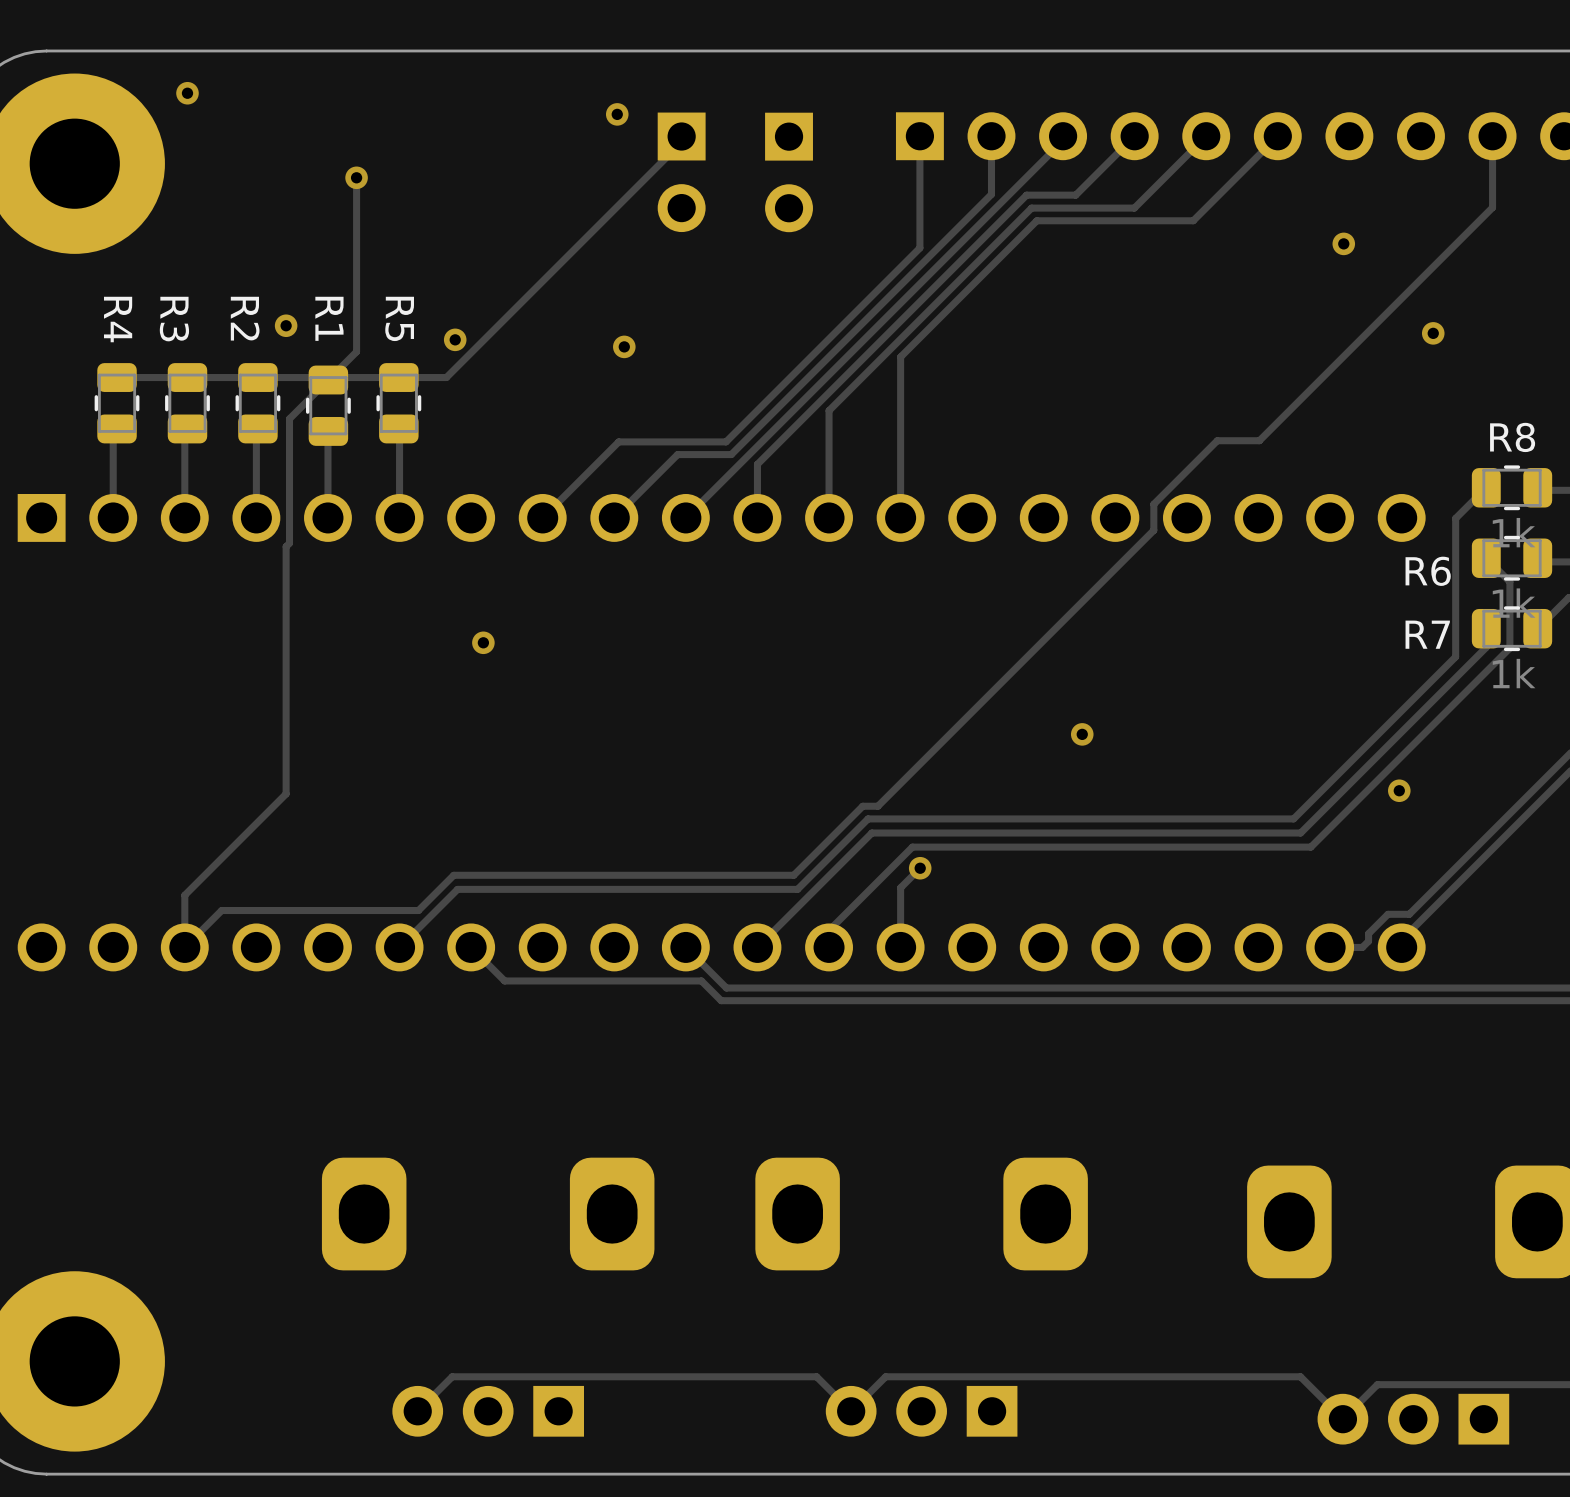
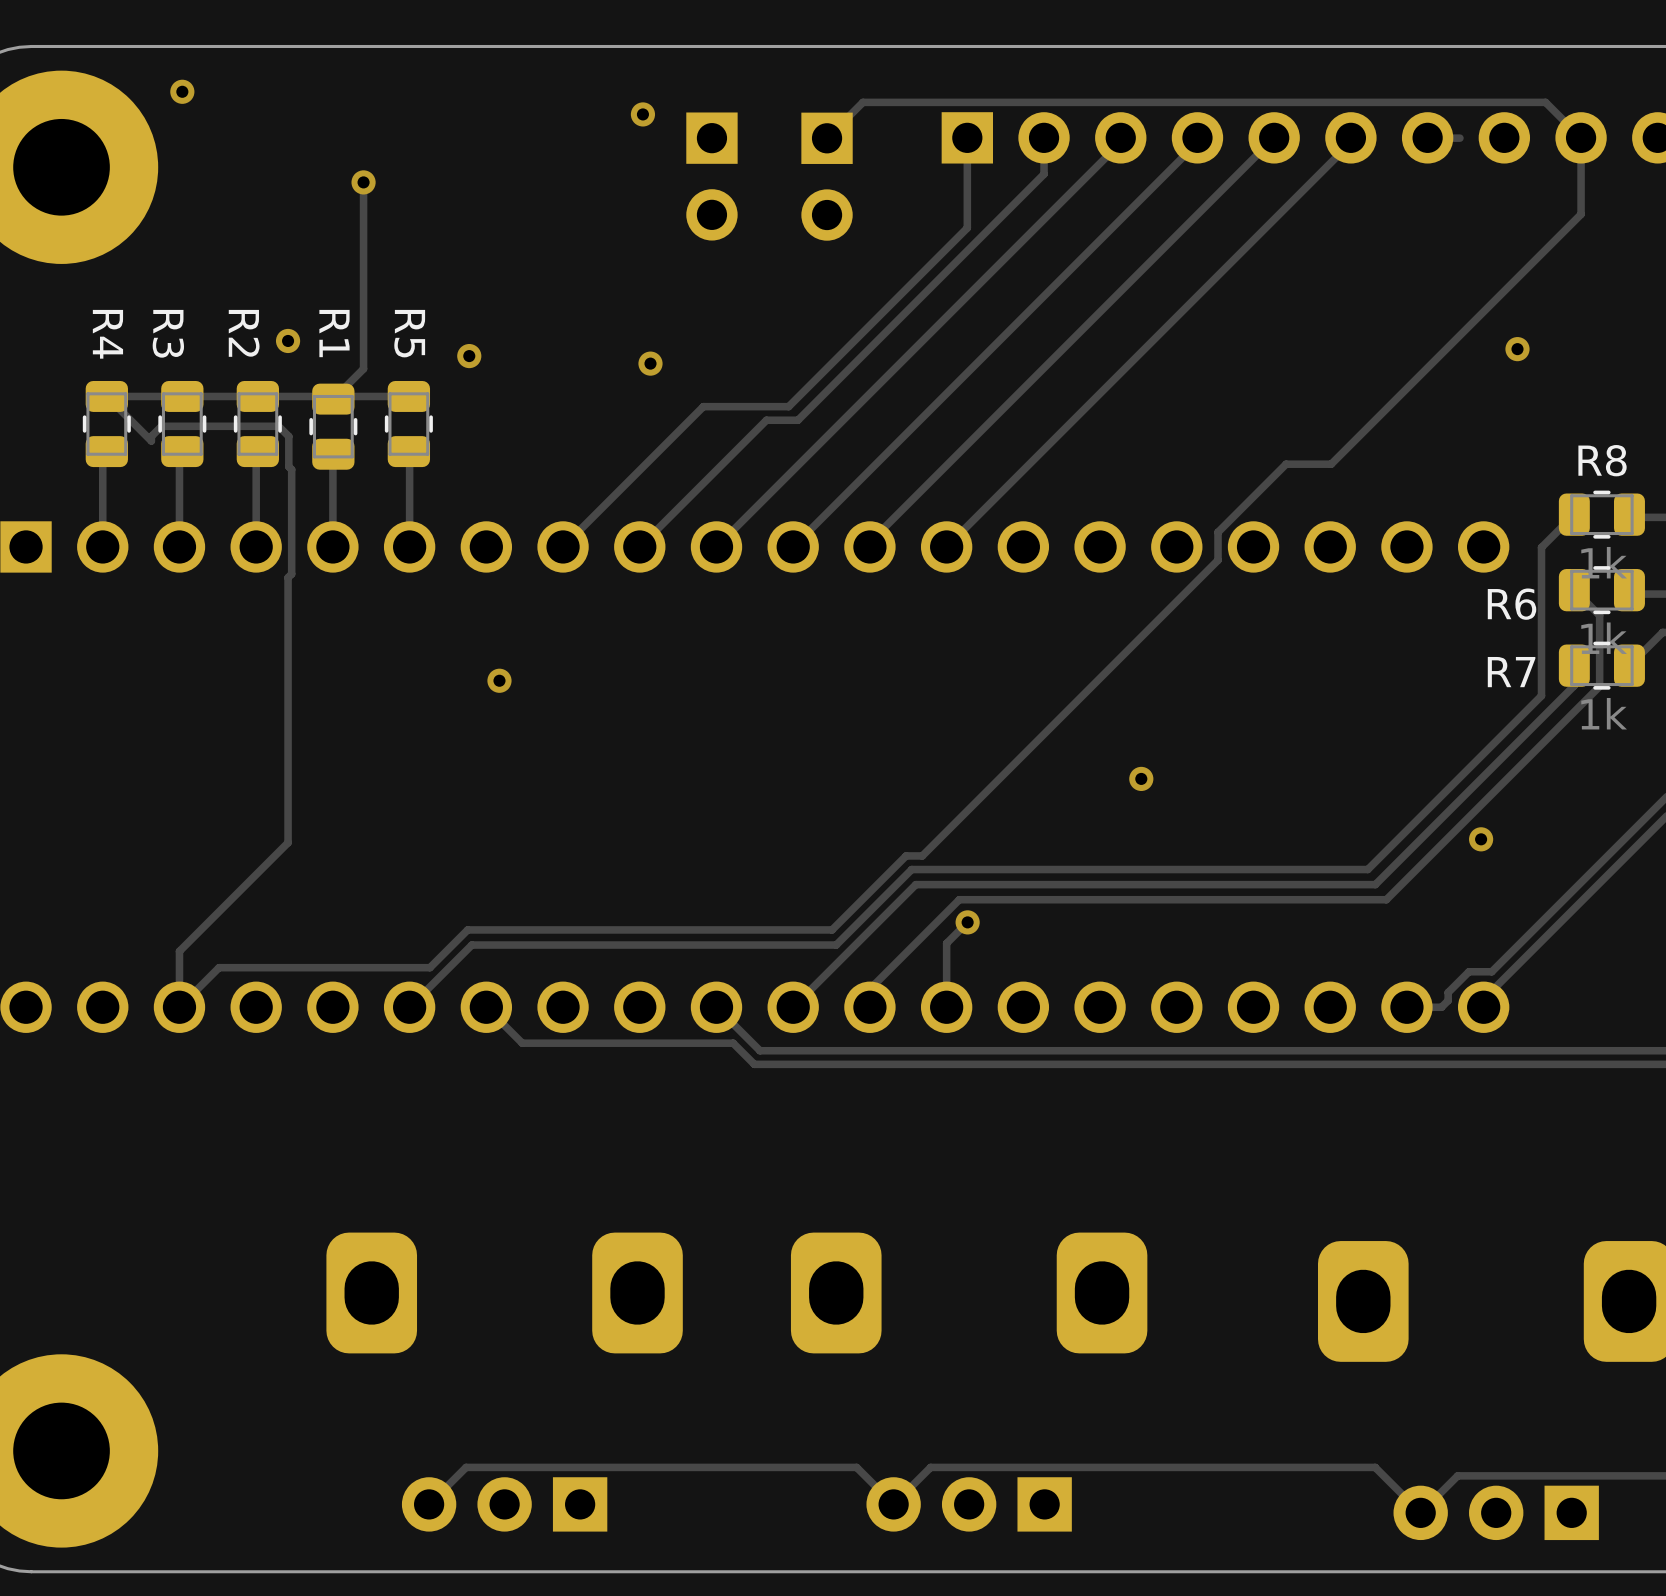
track: (681, 136) (681, 142) (446, 377) (398, 377) -> none
track: (1134, 136) (1075, 195) (1026, 195) (757, 464) (757, 509) -> none
track: (1277, 136) (1193, 220) (1036, 220) (900, 357) (900, 507) -> none
track: none -> (1459, 138) (1449, 138)
track: none -> (1581, 137) (1545, 102) (862, 102) (827, 138)
track: none -> (1197, 142) (793, 546)
track: none -> (1350, 142) (946, 546)
track: (991, 170) (991, 194) (731, 454) (677, 454) -> (1044, 174) (797, 420) (766, 420) (707, 479)
track: (1134, 208) (1031, 208) (829, 410) (829, 508) -> (1197, 214) (869, 542)
track: (919, 220) (919, 248) (726, 441) (618, 441) -> (967, 228) (788, 406) (703, 406) (644, 465)
via: (1343, 243) -> none
track: (328, 380) (289, 418) (289, 445) -> (106, 396) (151, 441) (151, 436) (161, 426) (278, 426) (288, 436) (288, 466) (291, 469)

